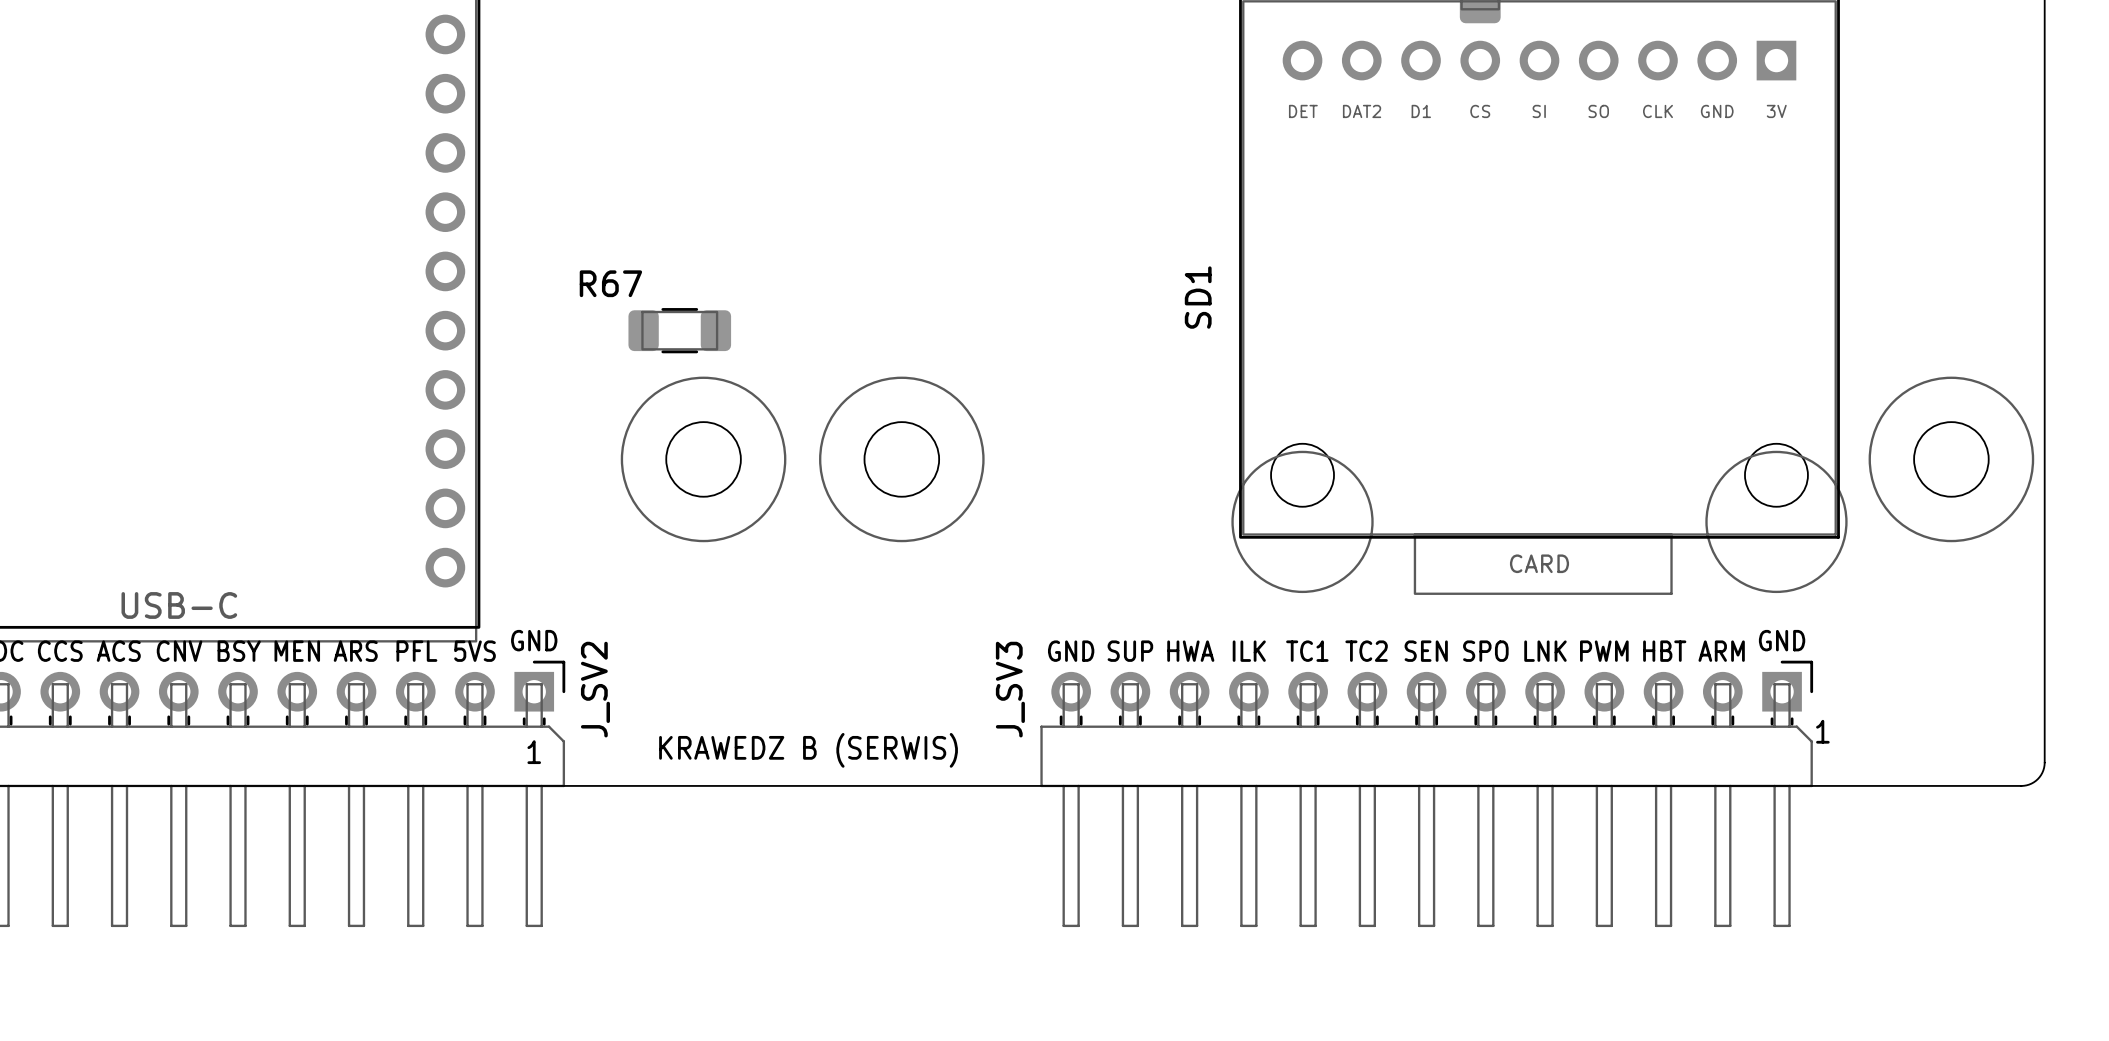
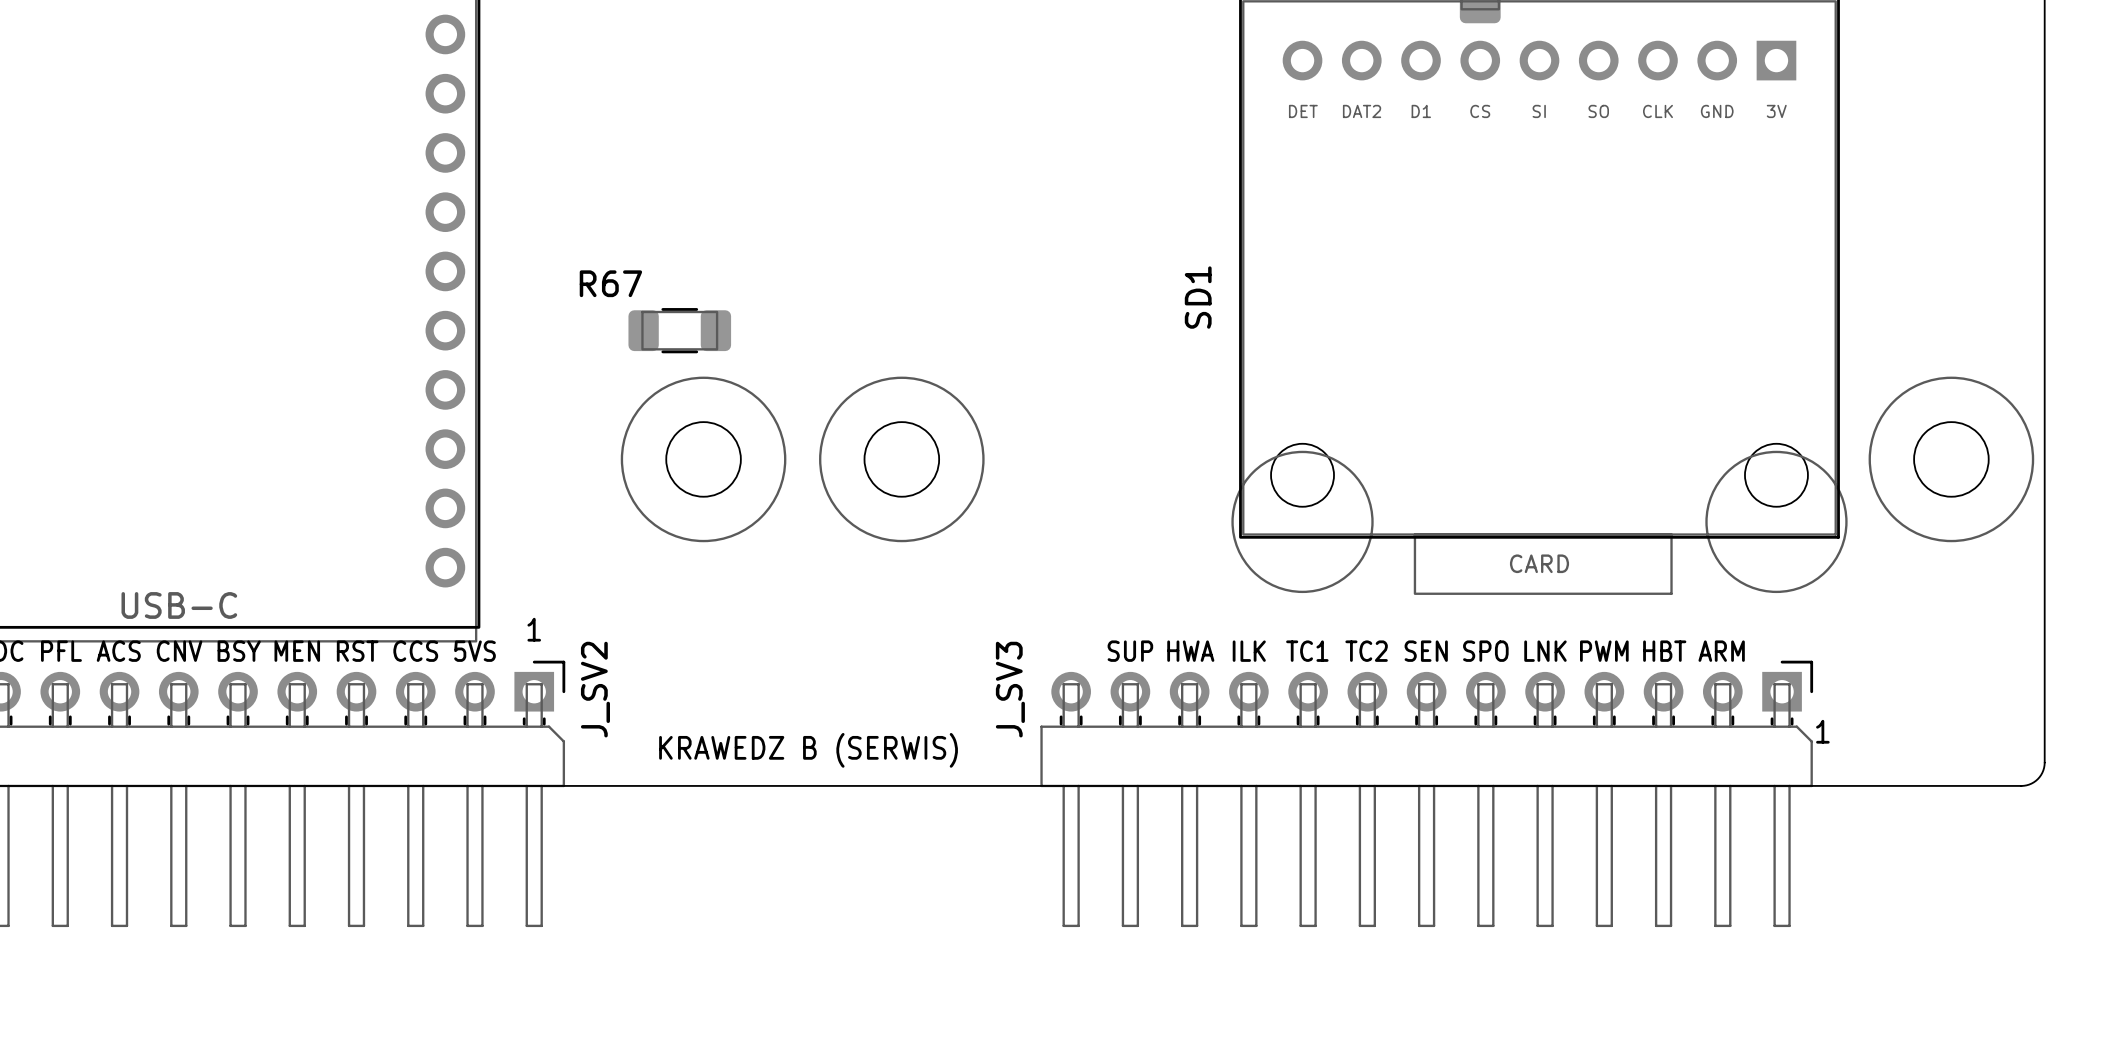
text: GND (534, 640) -> 1 (534, 629)
text: GND (1782, 640) -> none
text: CCS (60, 651) -> PFL (61, 651)
text: ARS (355, 651) -> RST (357, 651)
text: PFL (416, 651) -> CCS (415, 651)
text: GND (1071, 651) -> none
text: 1 (534, 752) -> none

